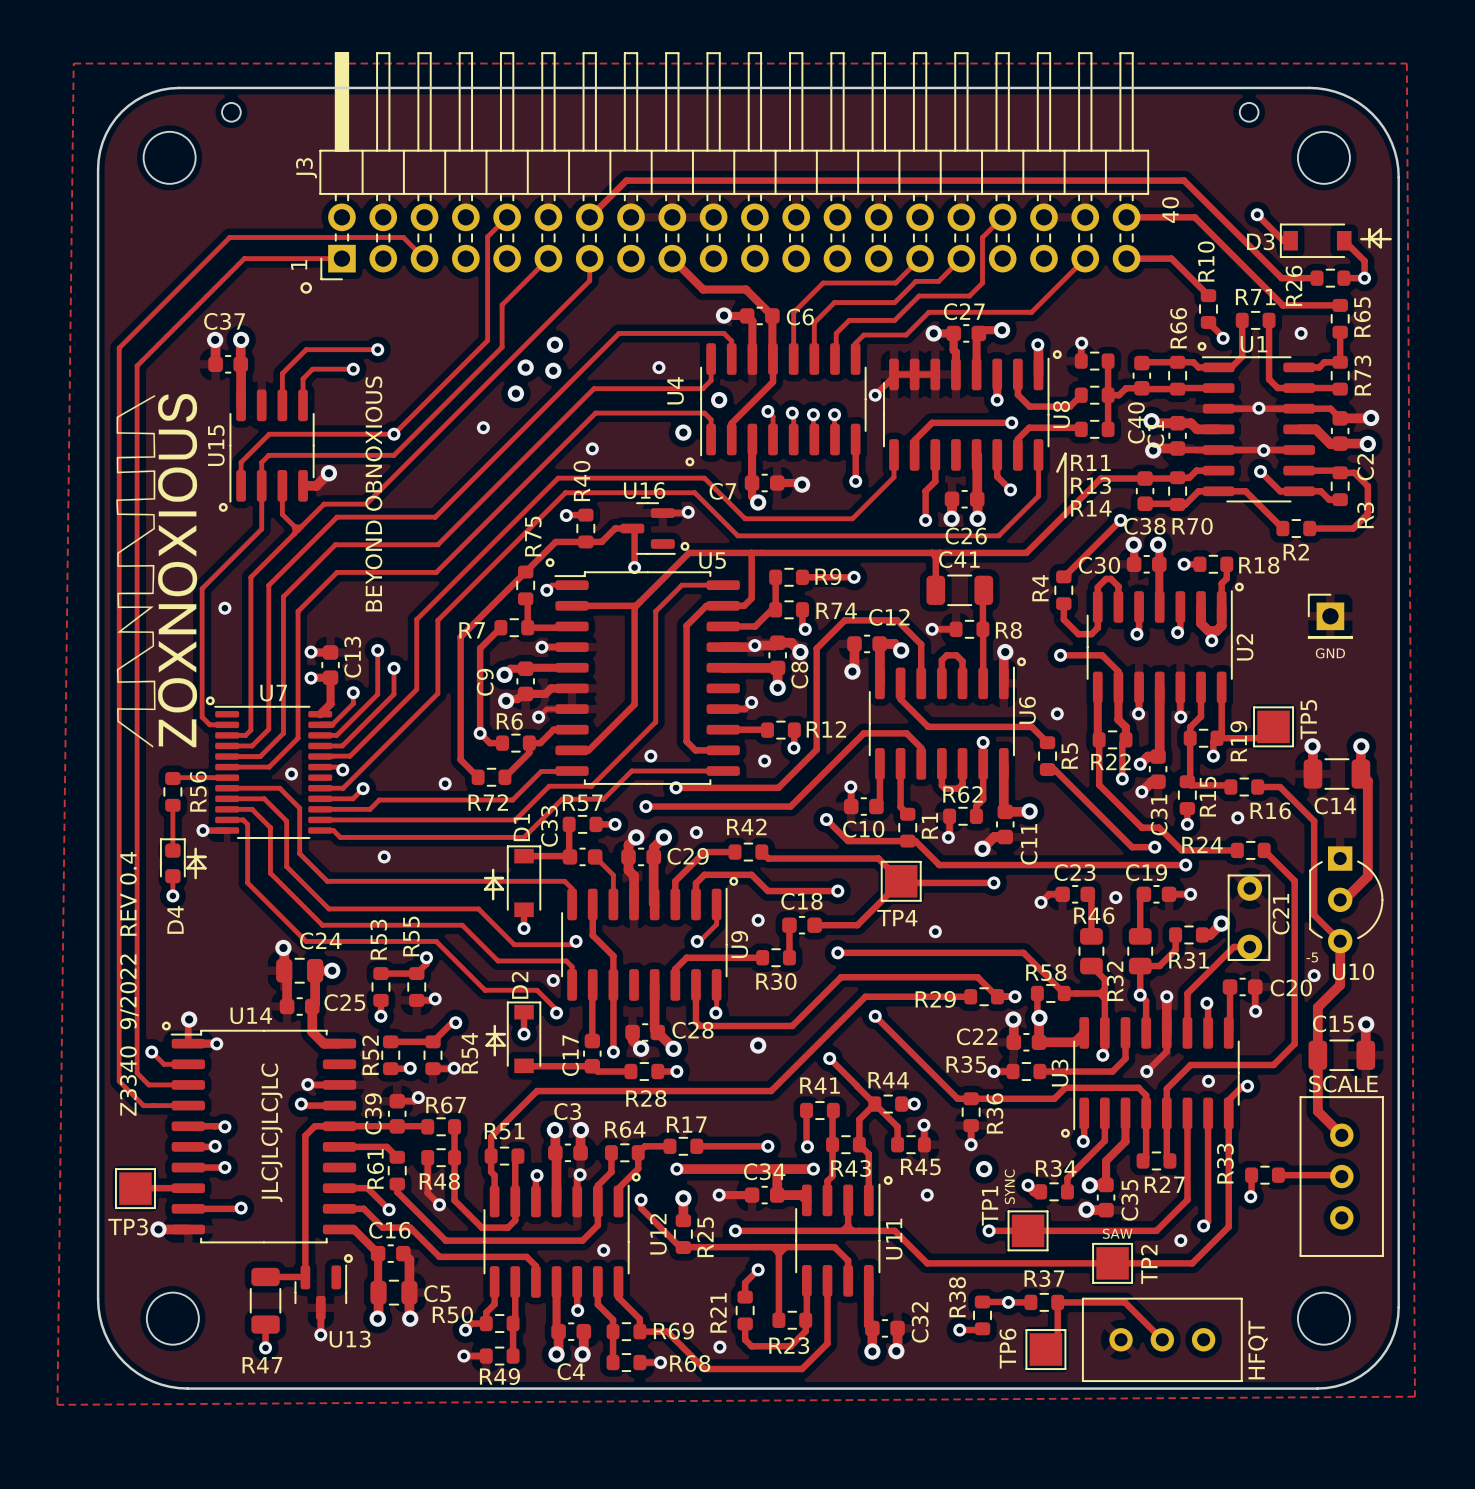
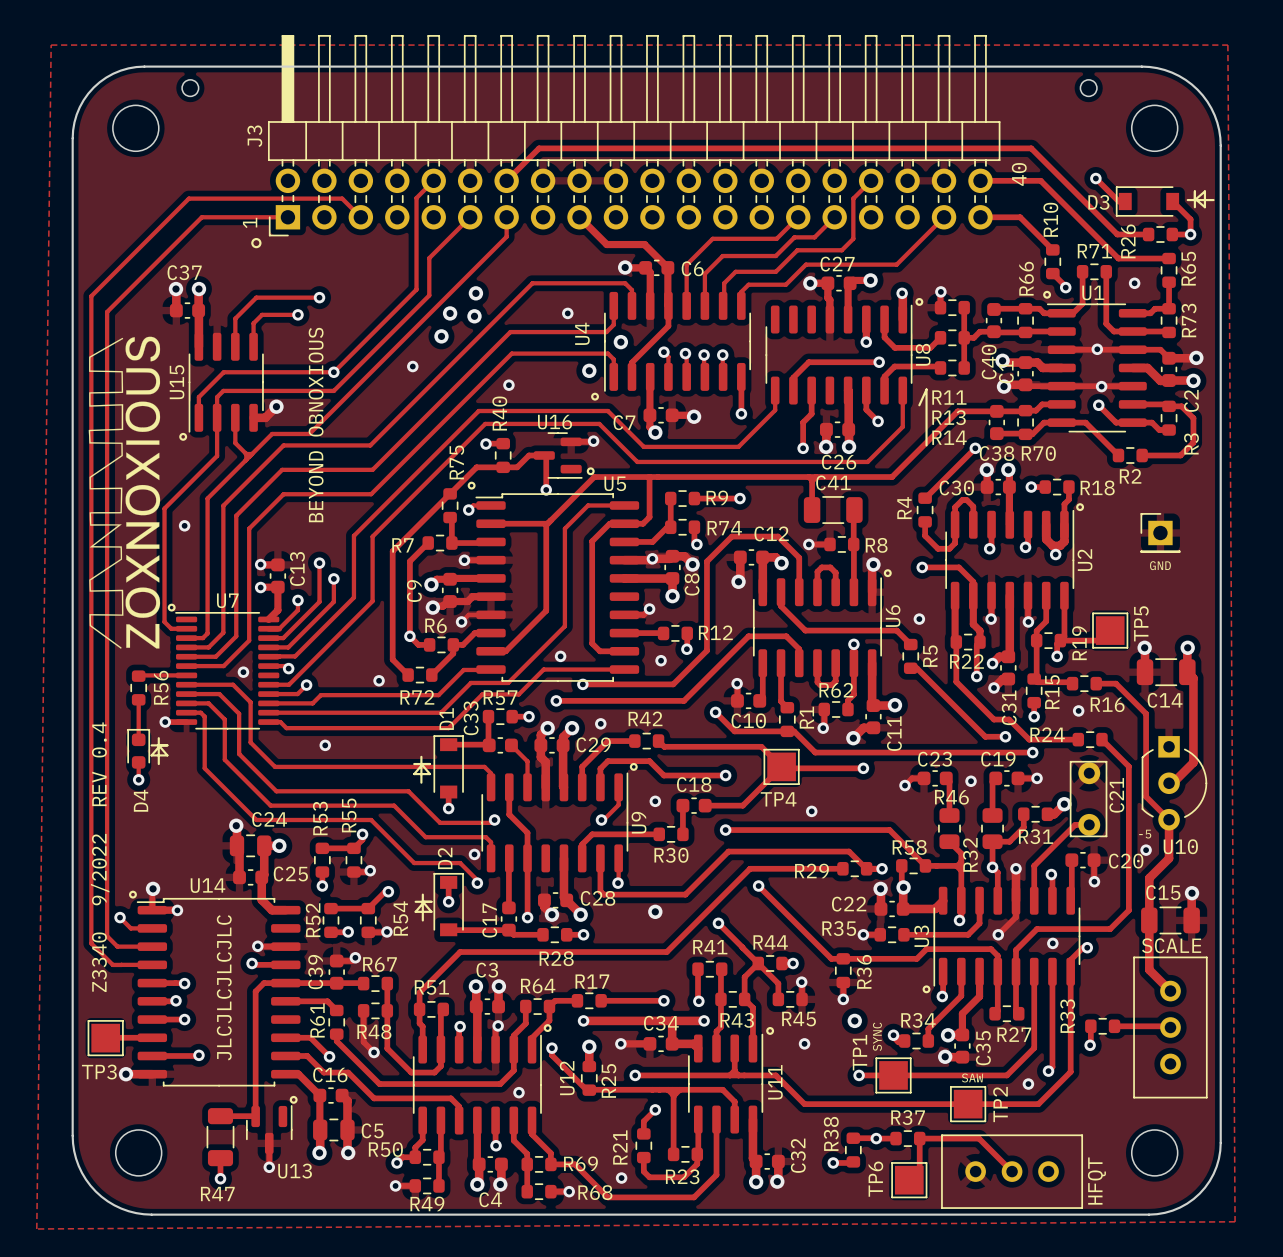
track: (935, 374) (895, 374) (875, 395) -> none
via: (875, 395) -> none

